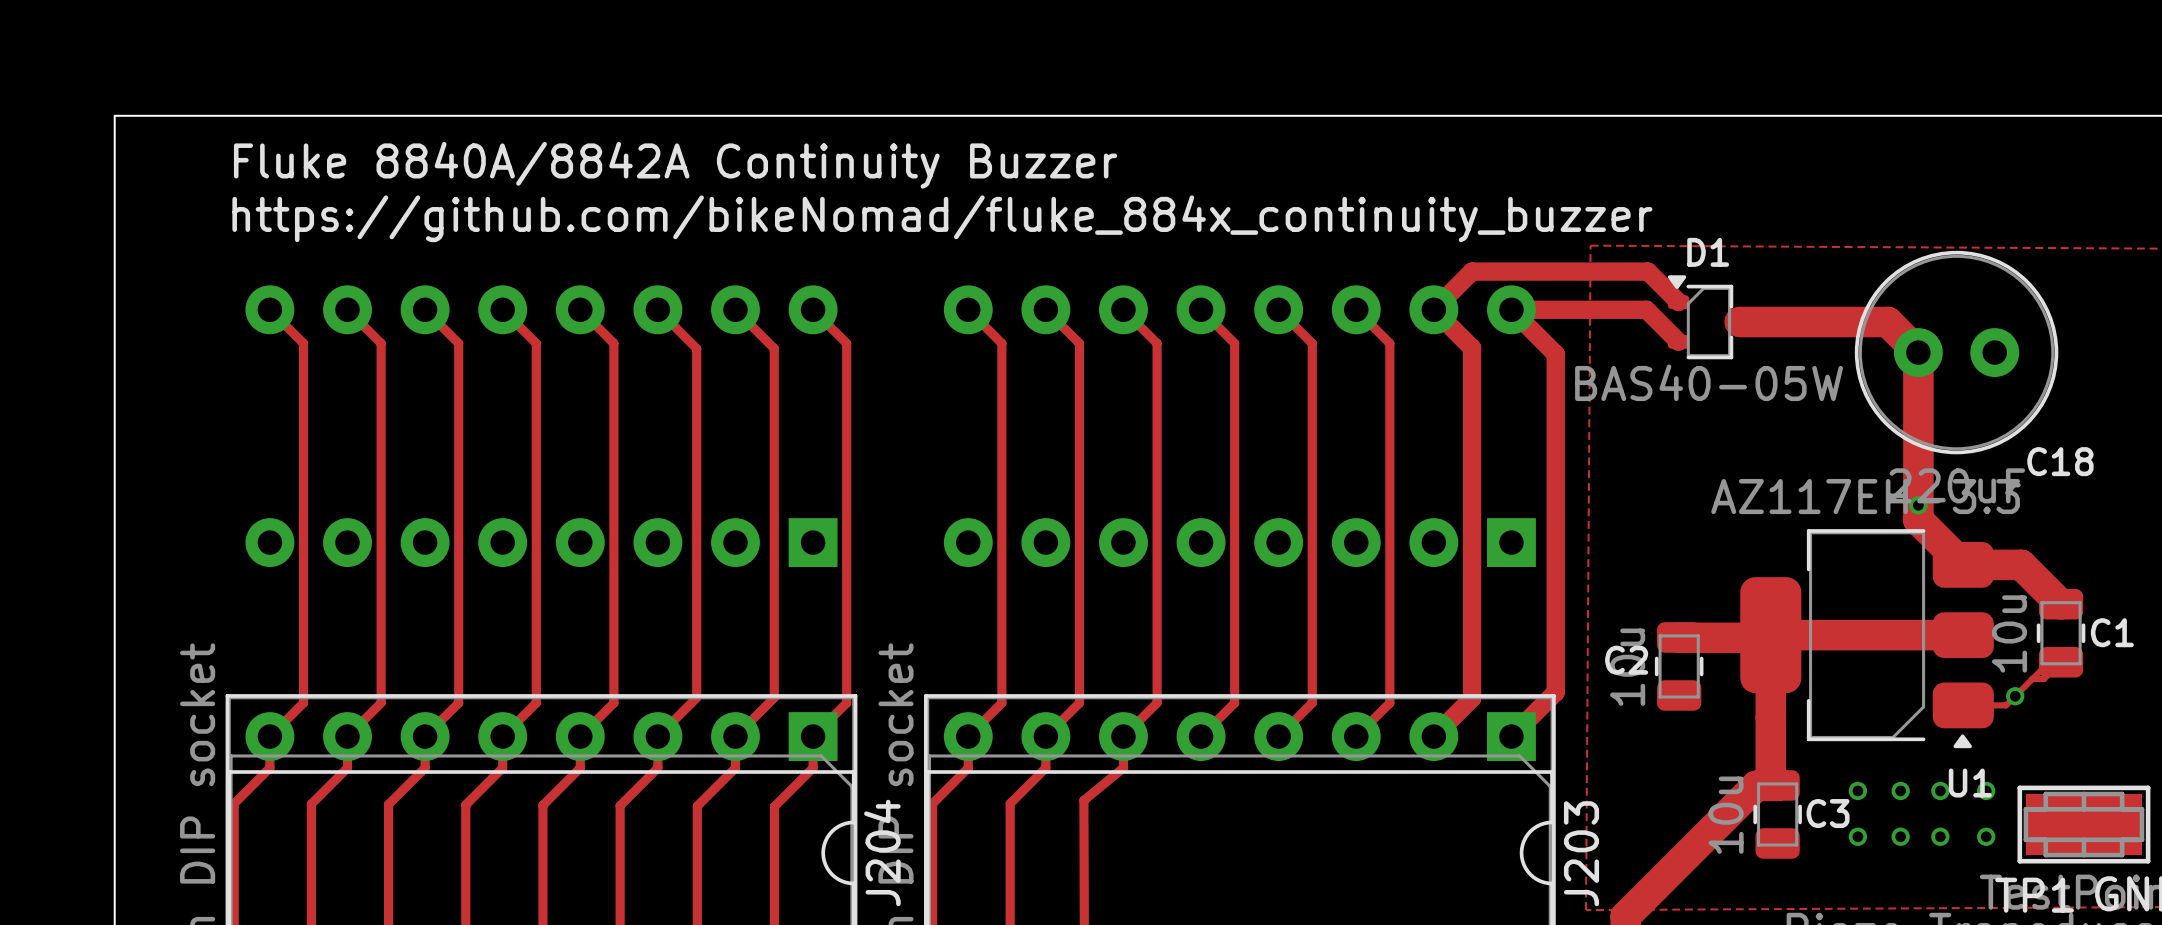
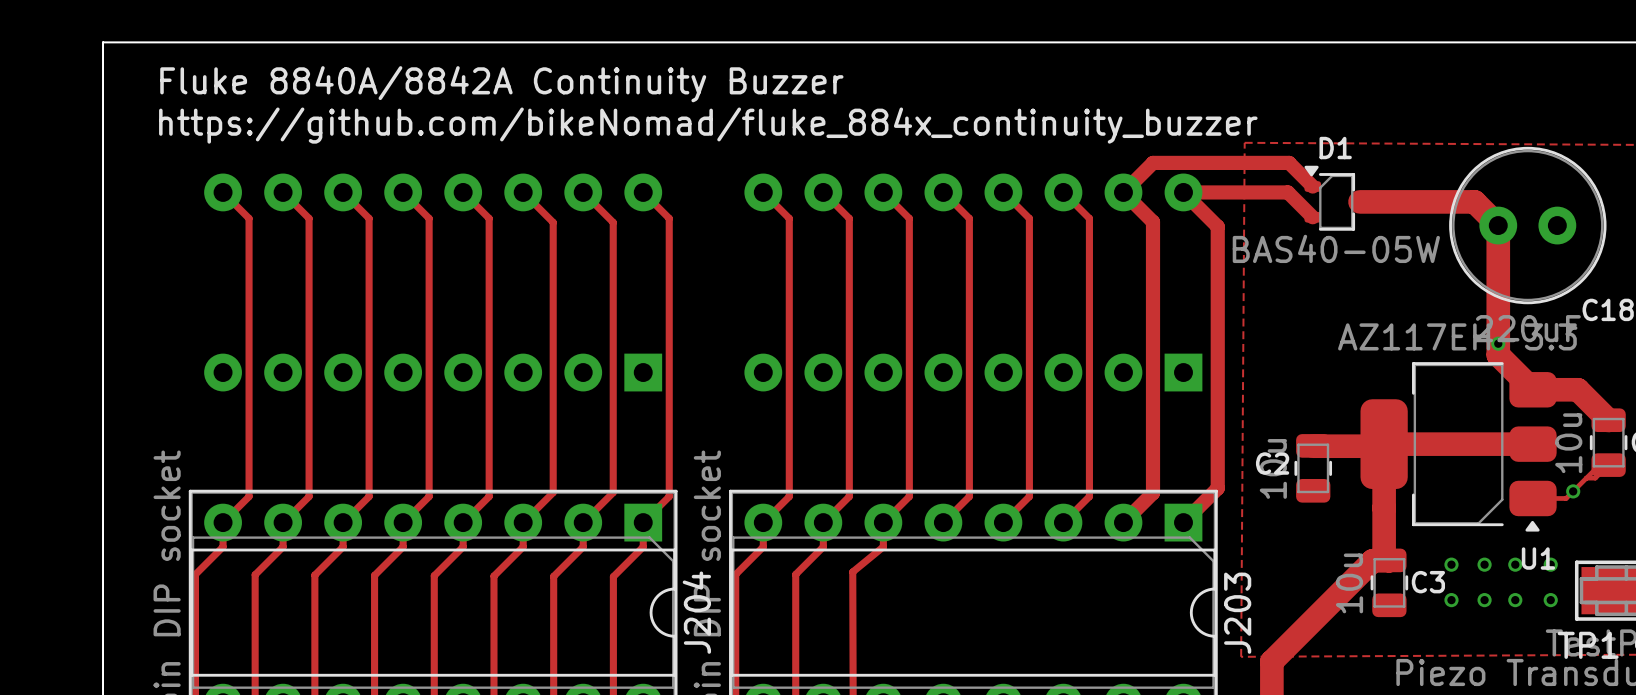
text position: Fluke 8840A/8842A Continuity Buzzer (675, 165) -> Fluke 8840A/8842A Continuity Buzzer (501, 84)
text position: https://github.com/bikeNomad/fluke_884x_continuity_buzzer (942, 218) -> https://github.com/bikeNomad/fluke_884x_continuity_buzzer (708, 125)

